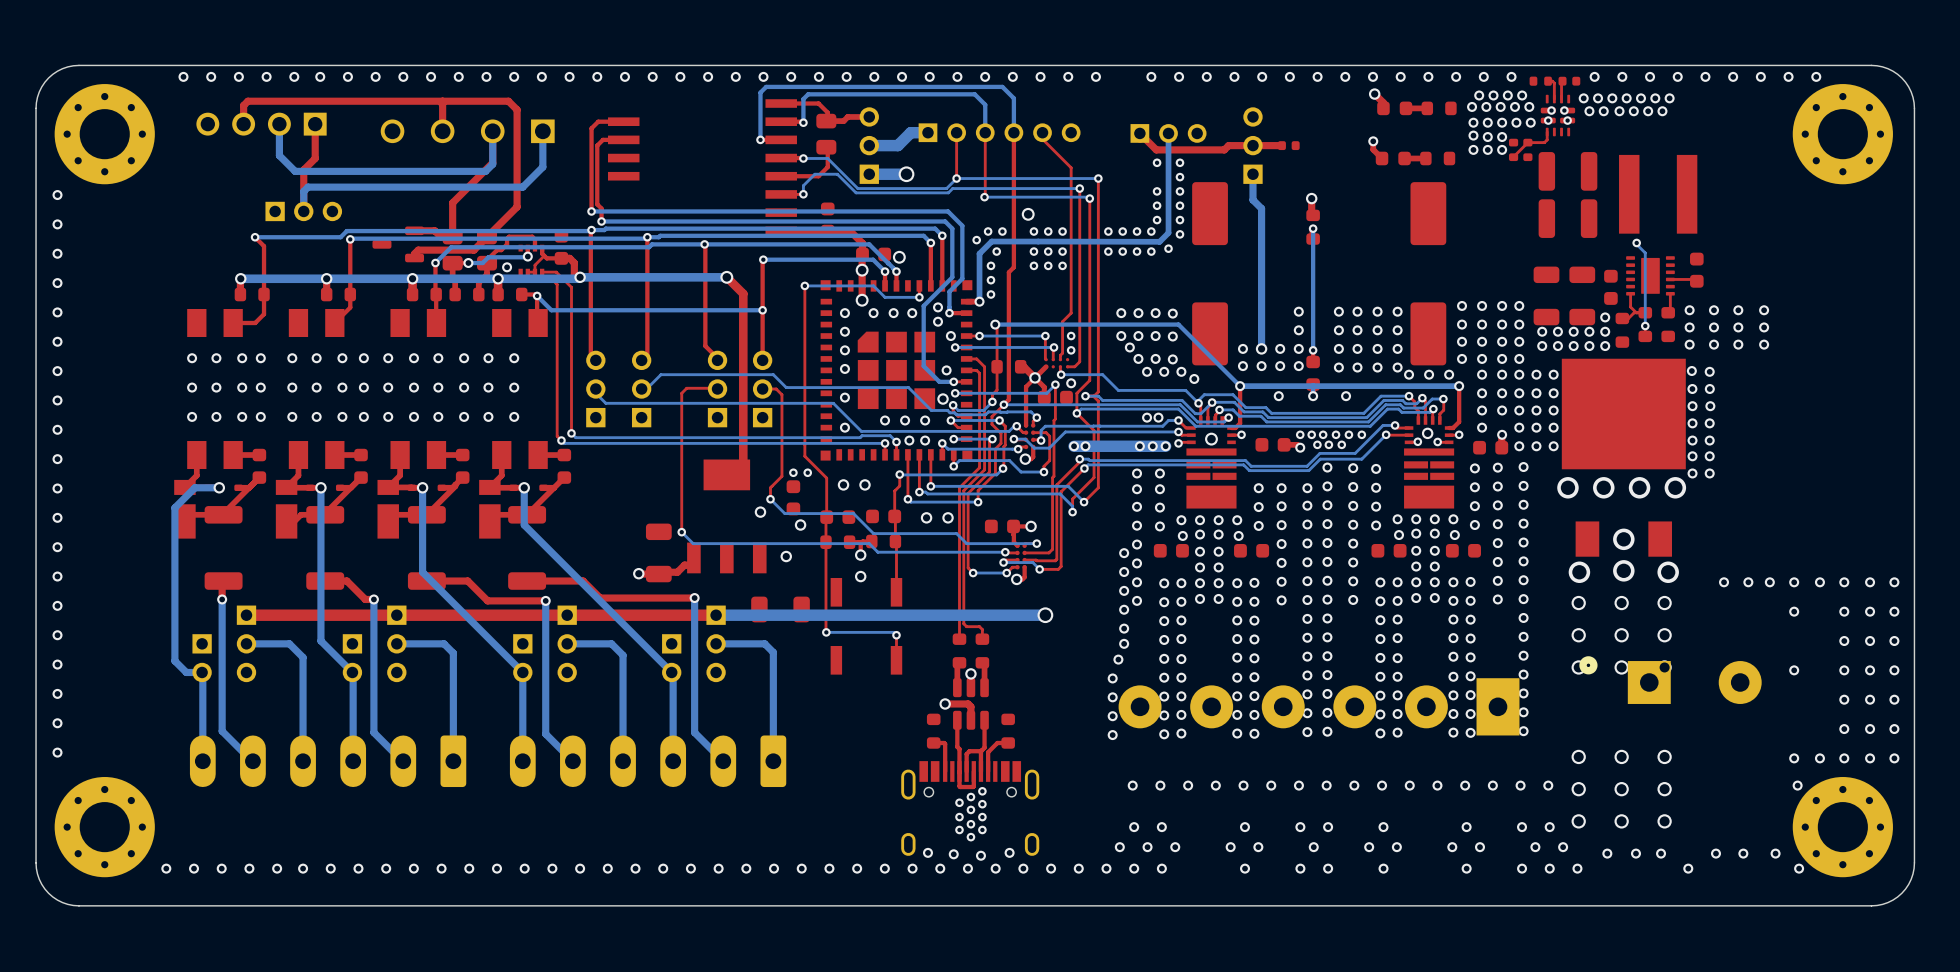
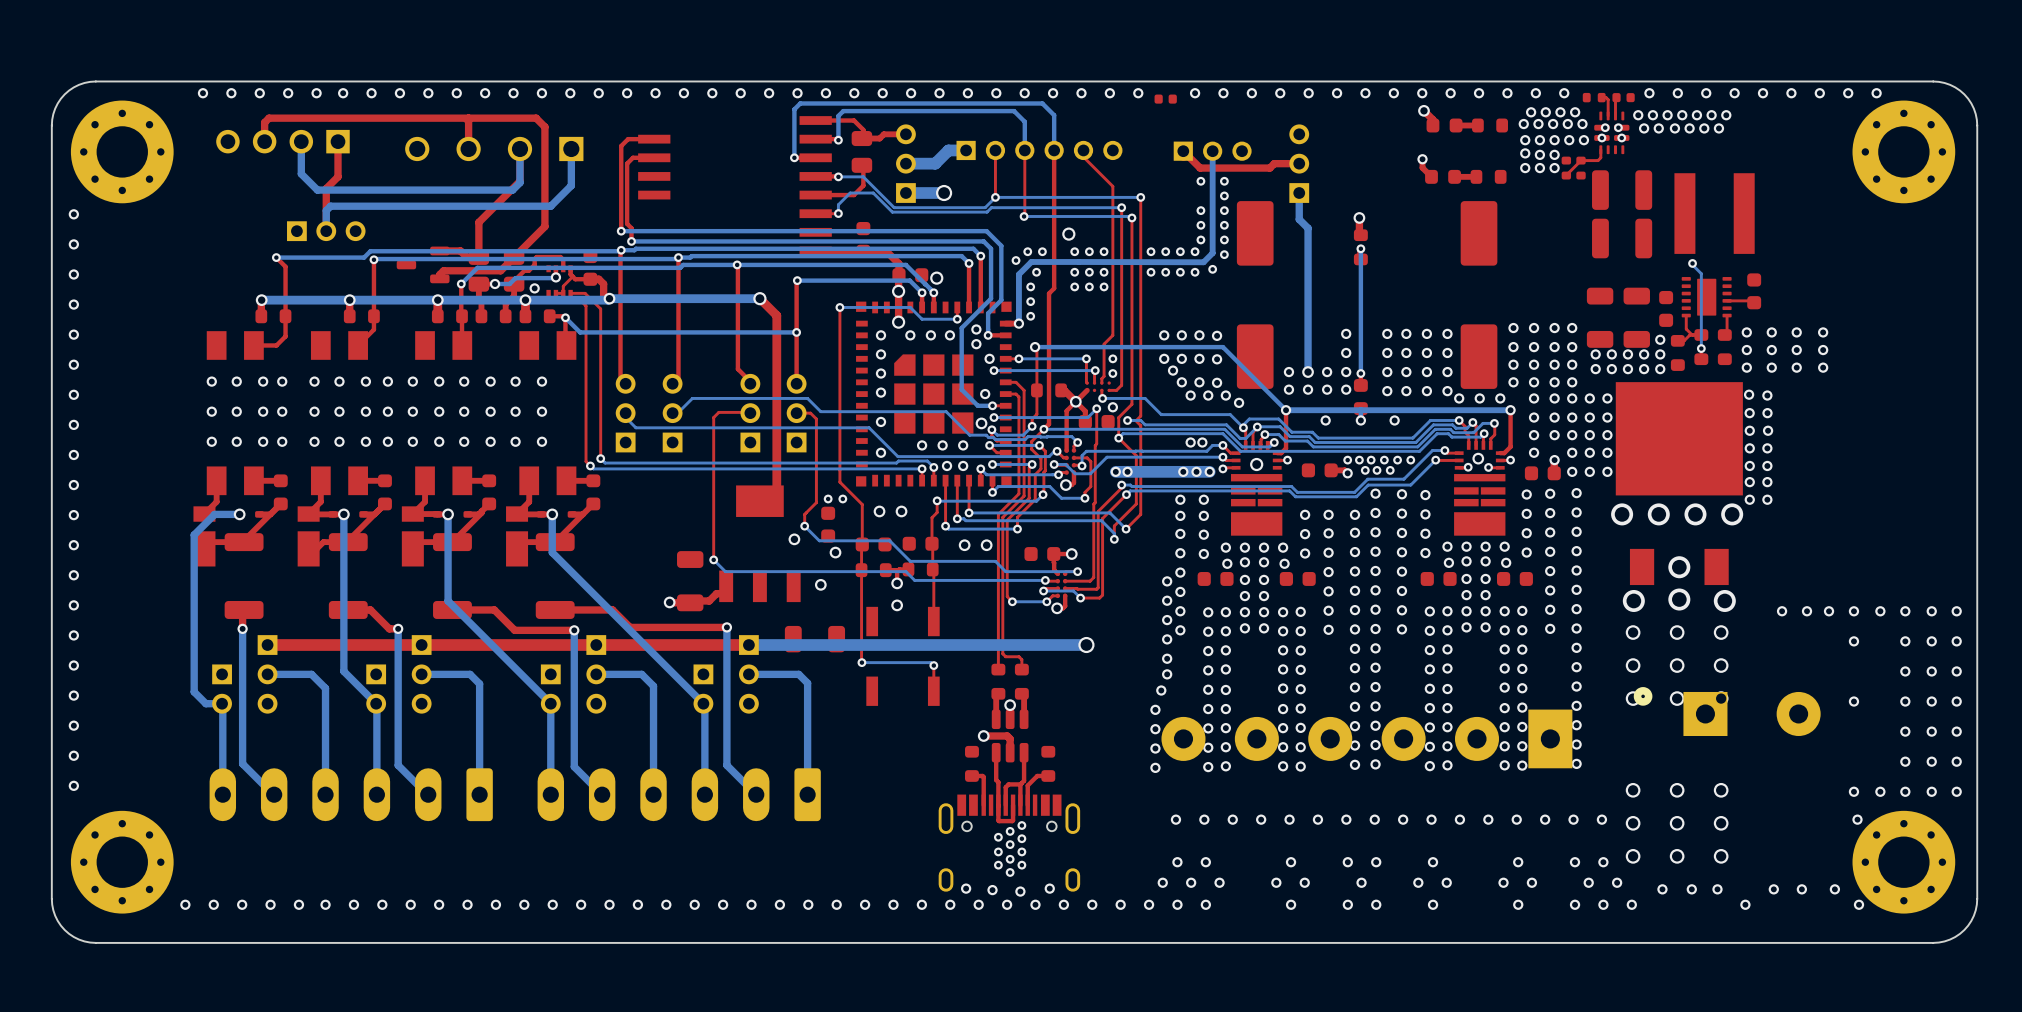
top track: (1281, 145) (1252, 145) -> none
part position: (1288, 145) -> (1165, 99)

